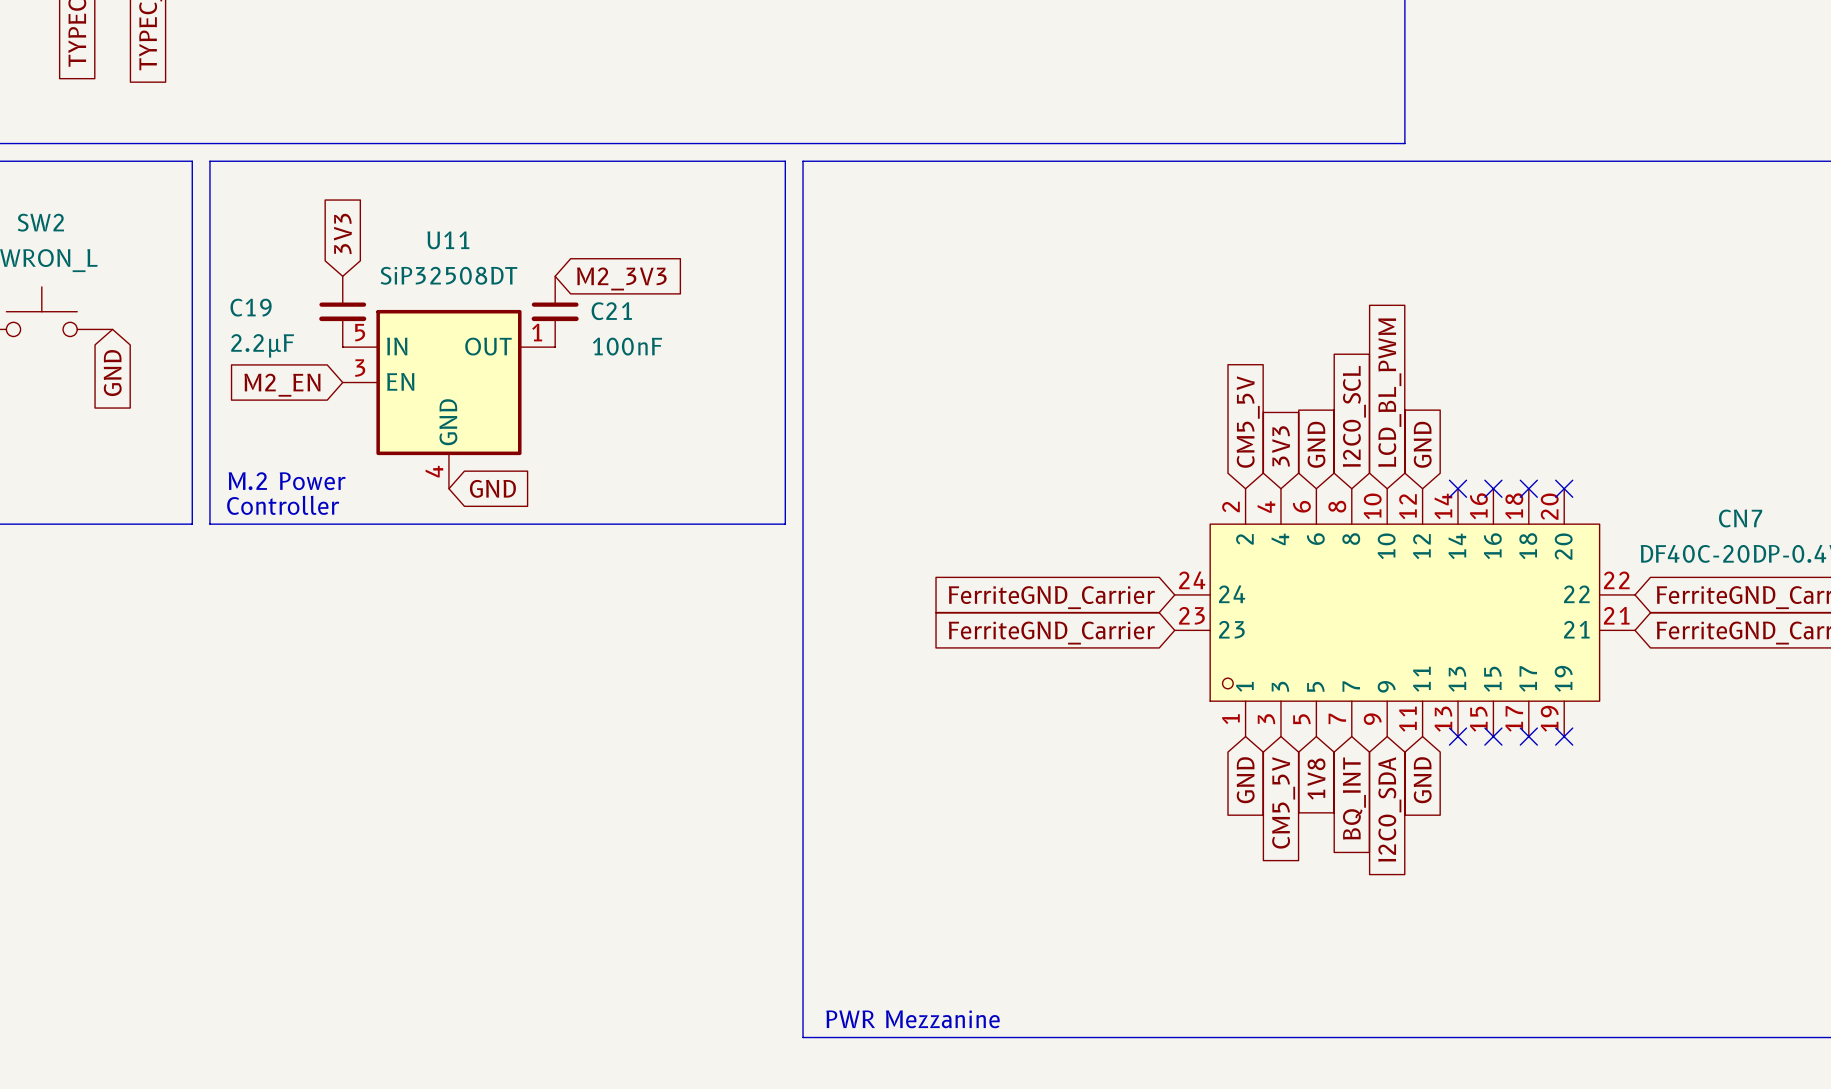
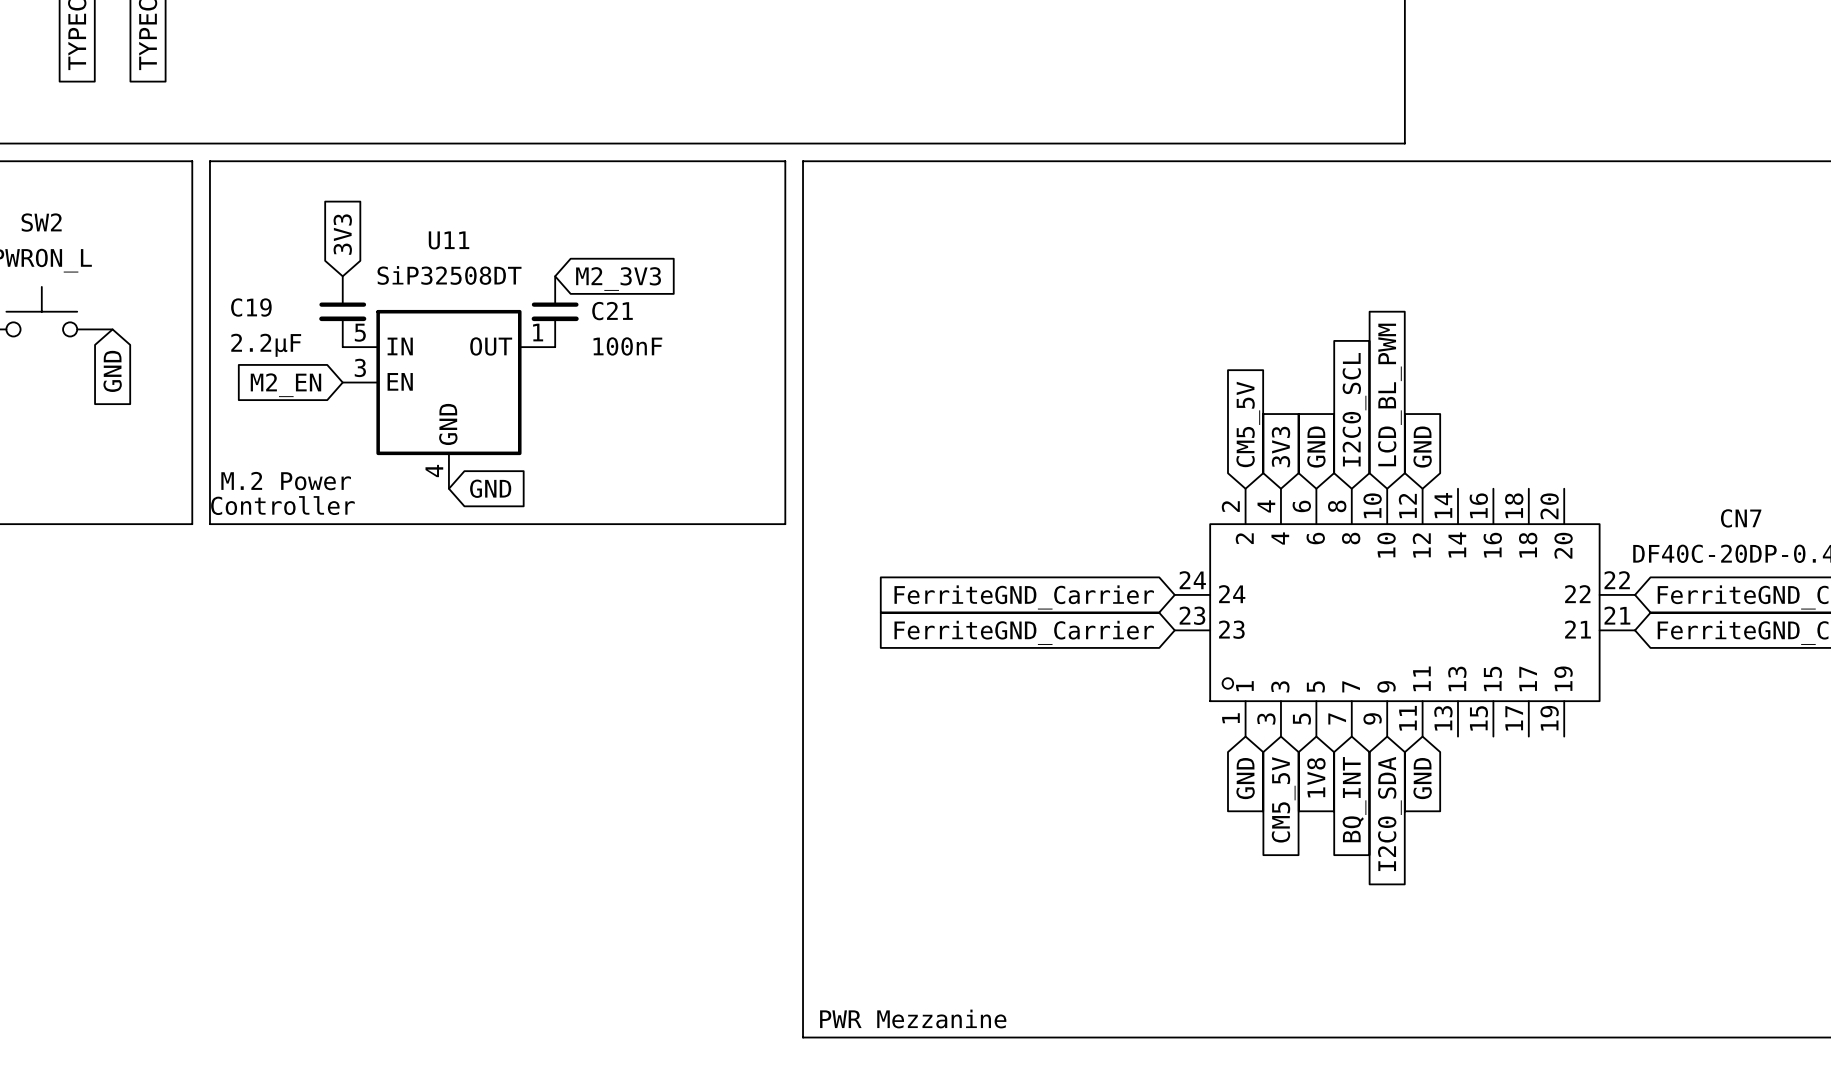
no-connect mark: (1458, 488) -> none
no-connect mark: (1493, 488) -> none
no-connect mark: (1528, 488) -> none
no-connect mark: (1564, 488) -> none
no-connect mark: (1458, 736) -> none
no-connect mark: (1493, 736) -> none
no-connect mark: (1528, 736) -> none
no-connect mark: (1564, 736) -> none

